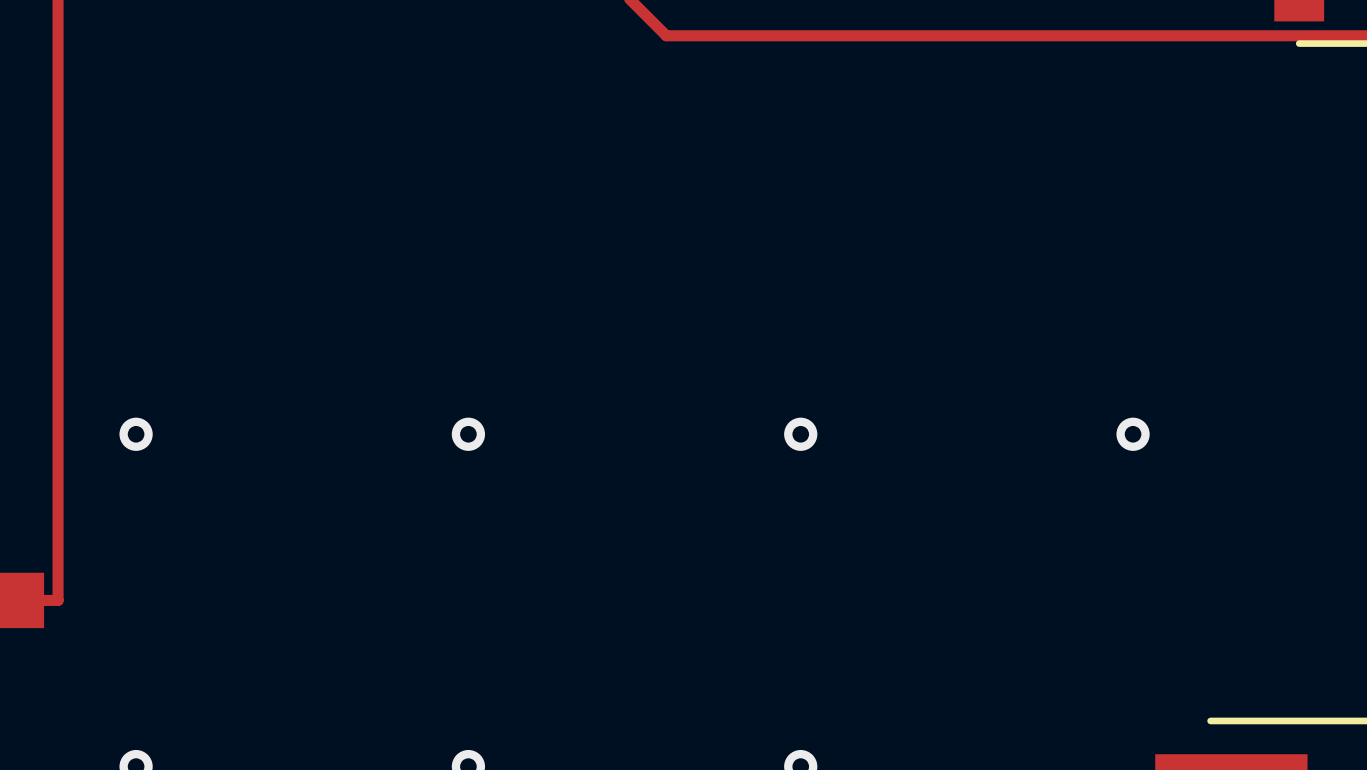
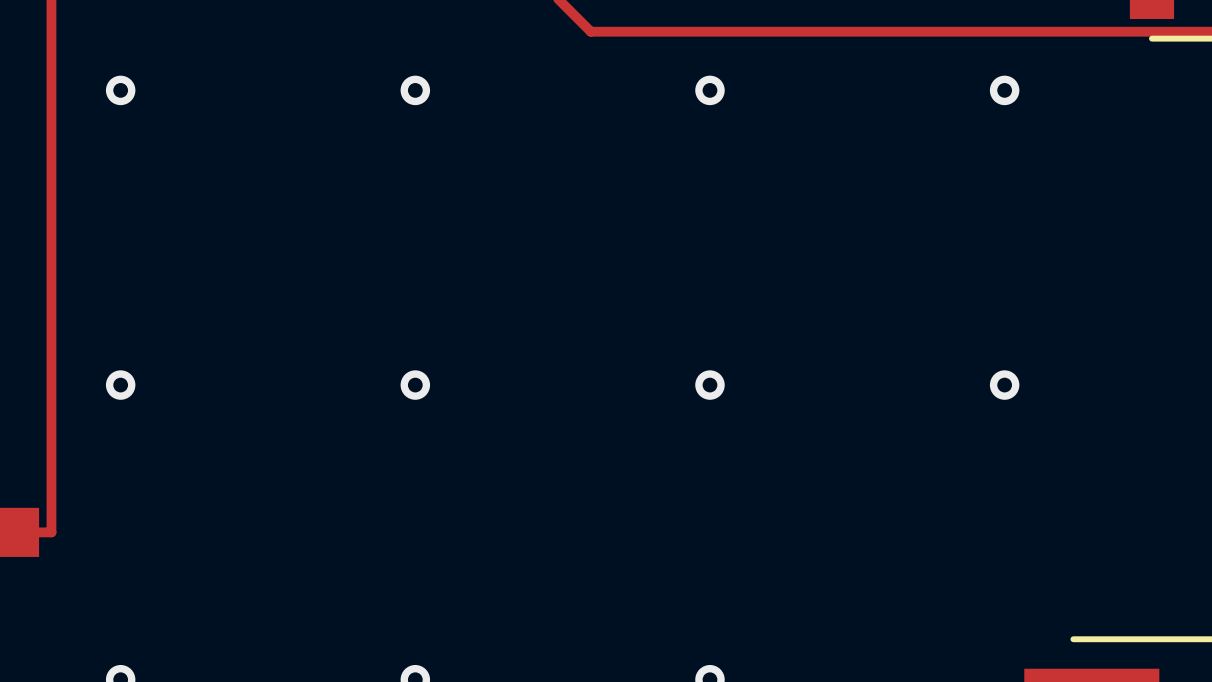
via: none -> (120, 90)
via: none -> (415, 90)
via: none -> (709, 90)
via: none -> (1004, 90)

